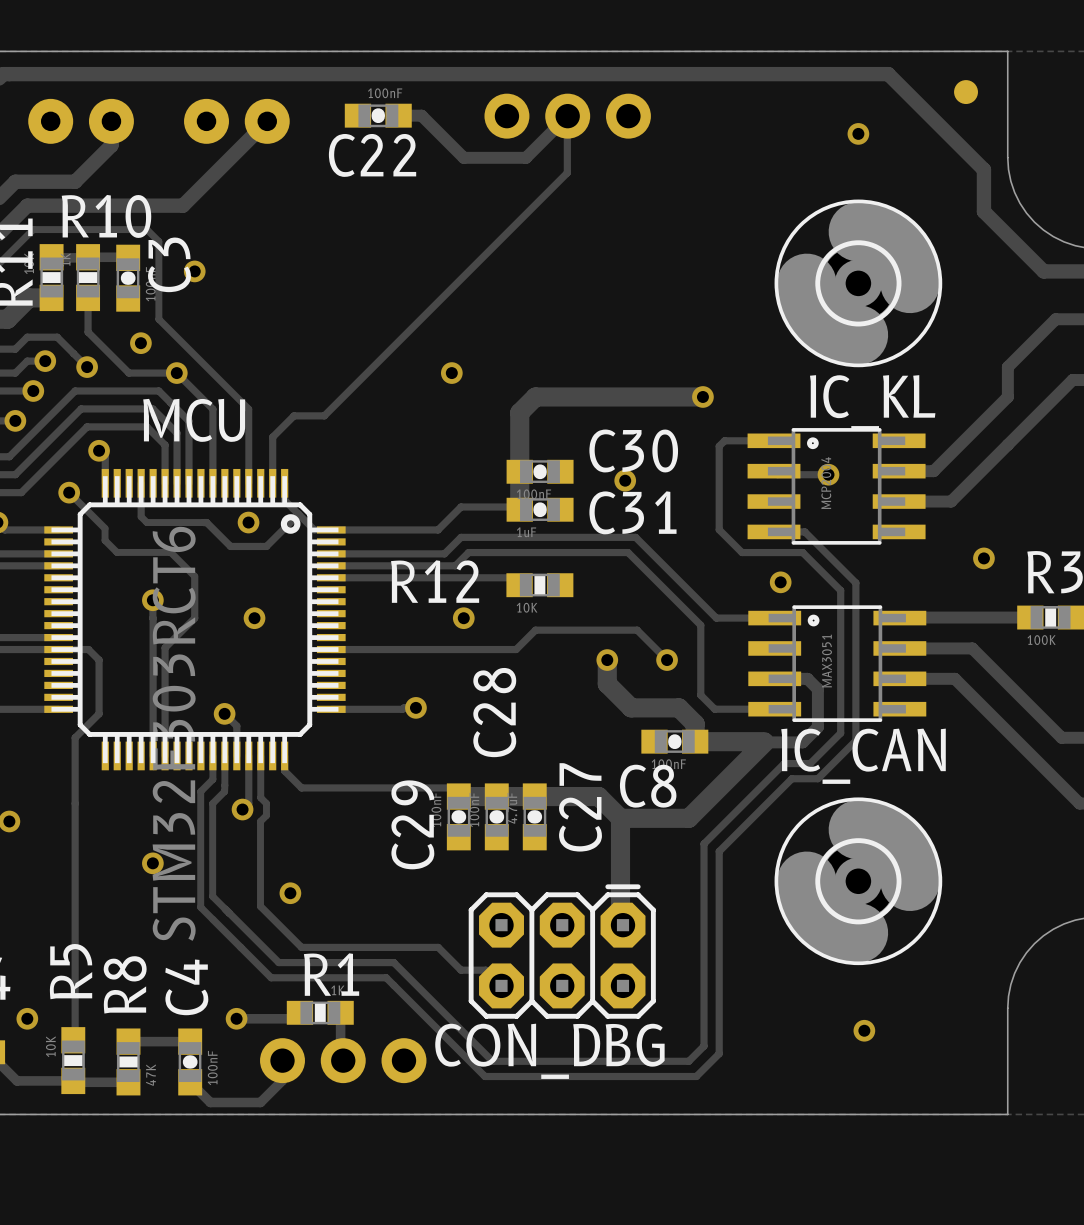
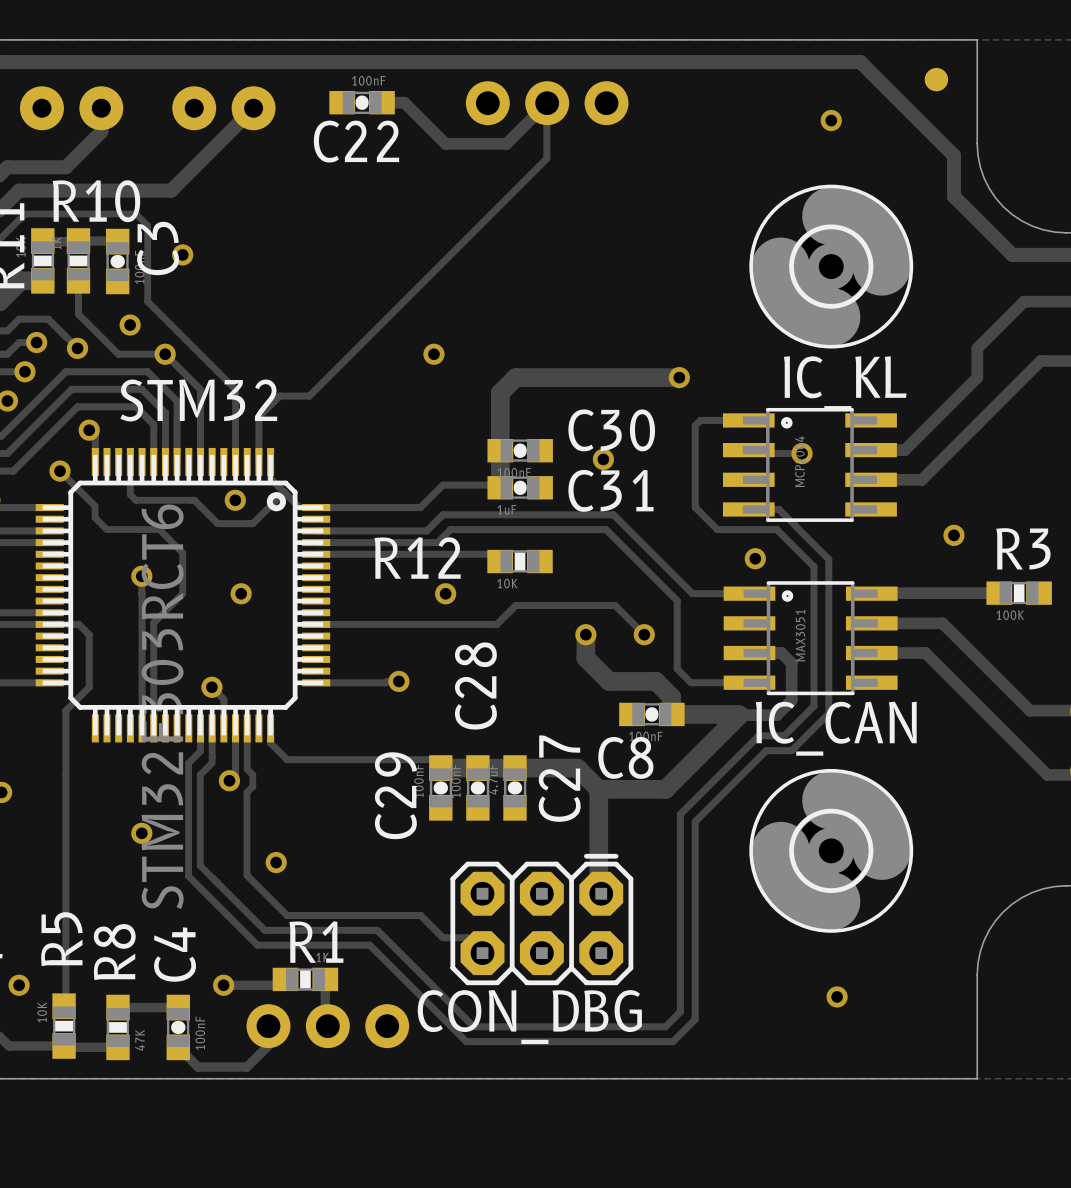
MCU name: MCU (194, 420) -> STM32 (198, 400)

